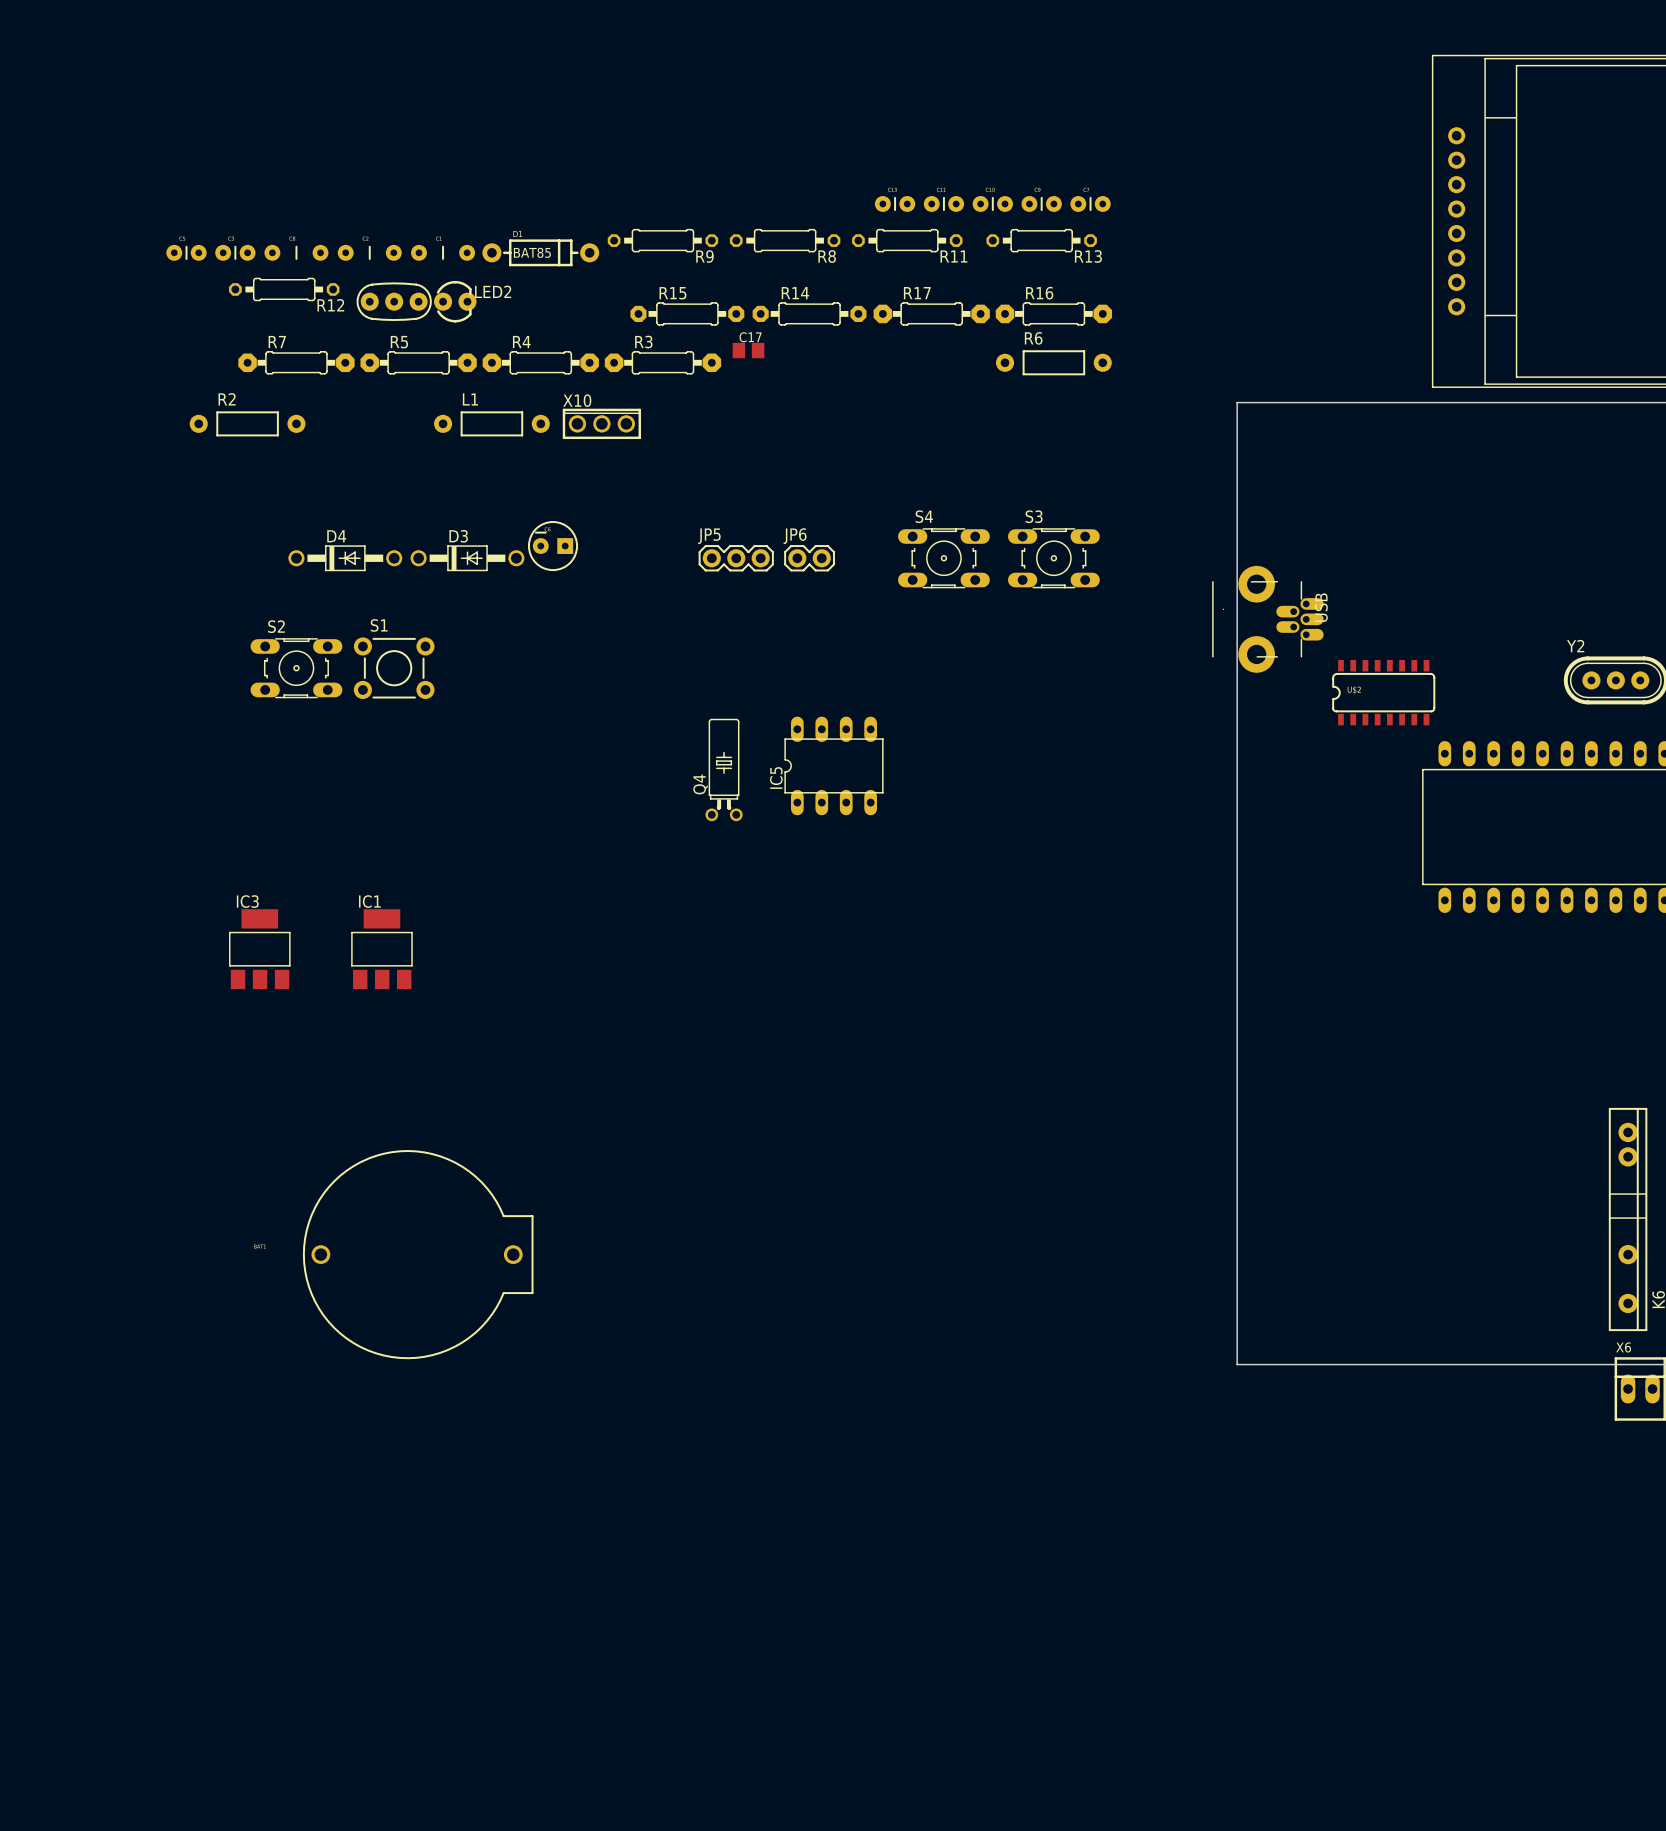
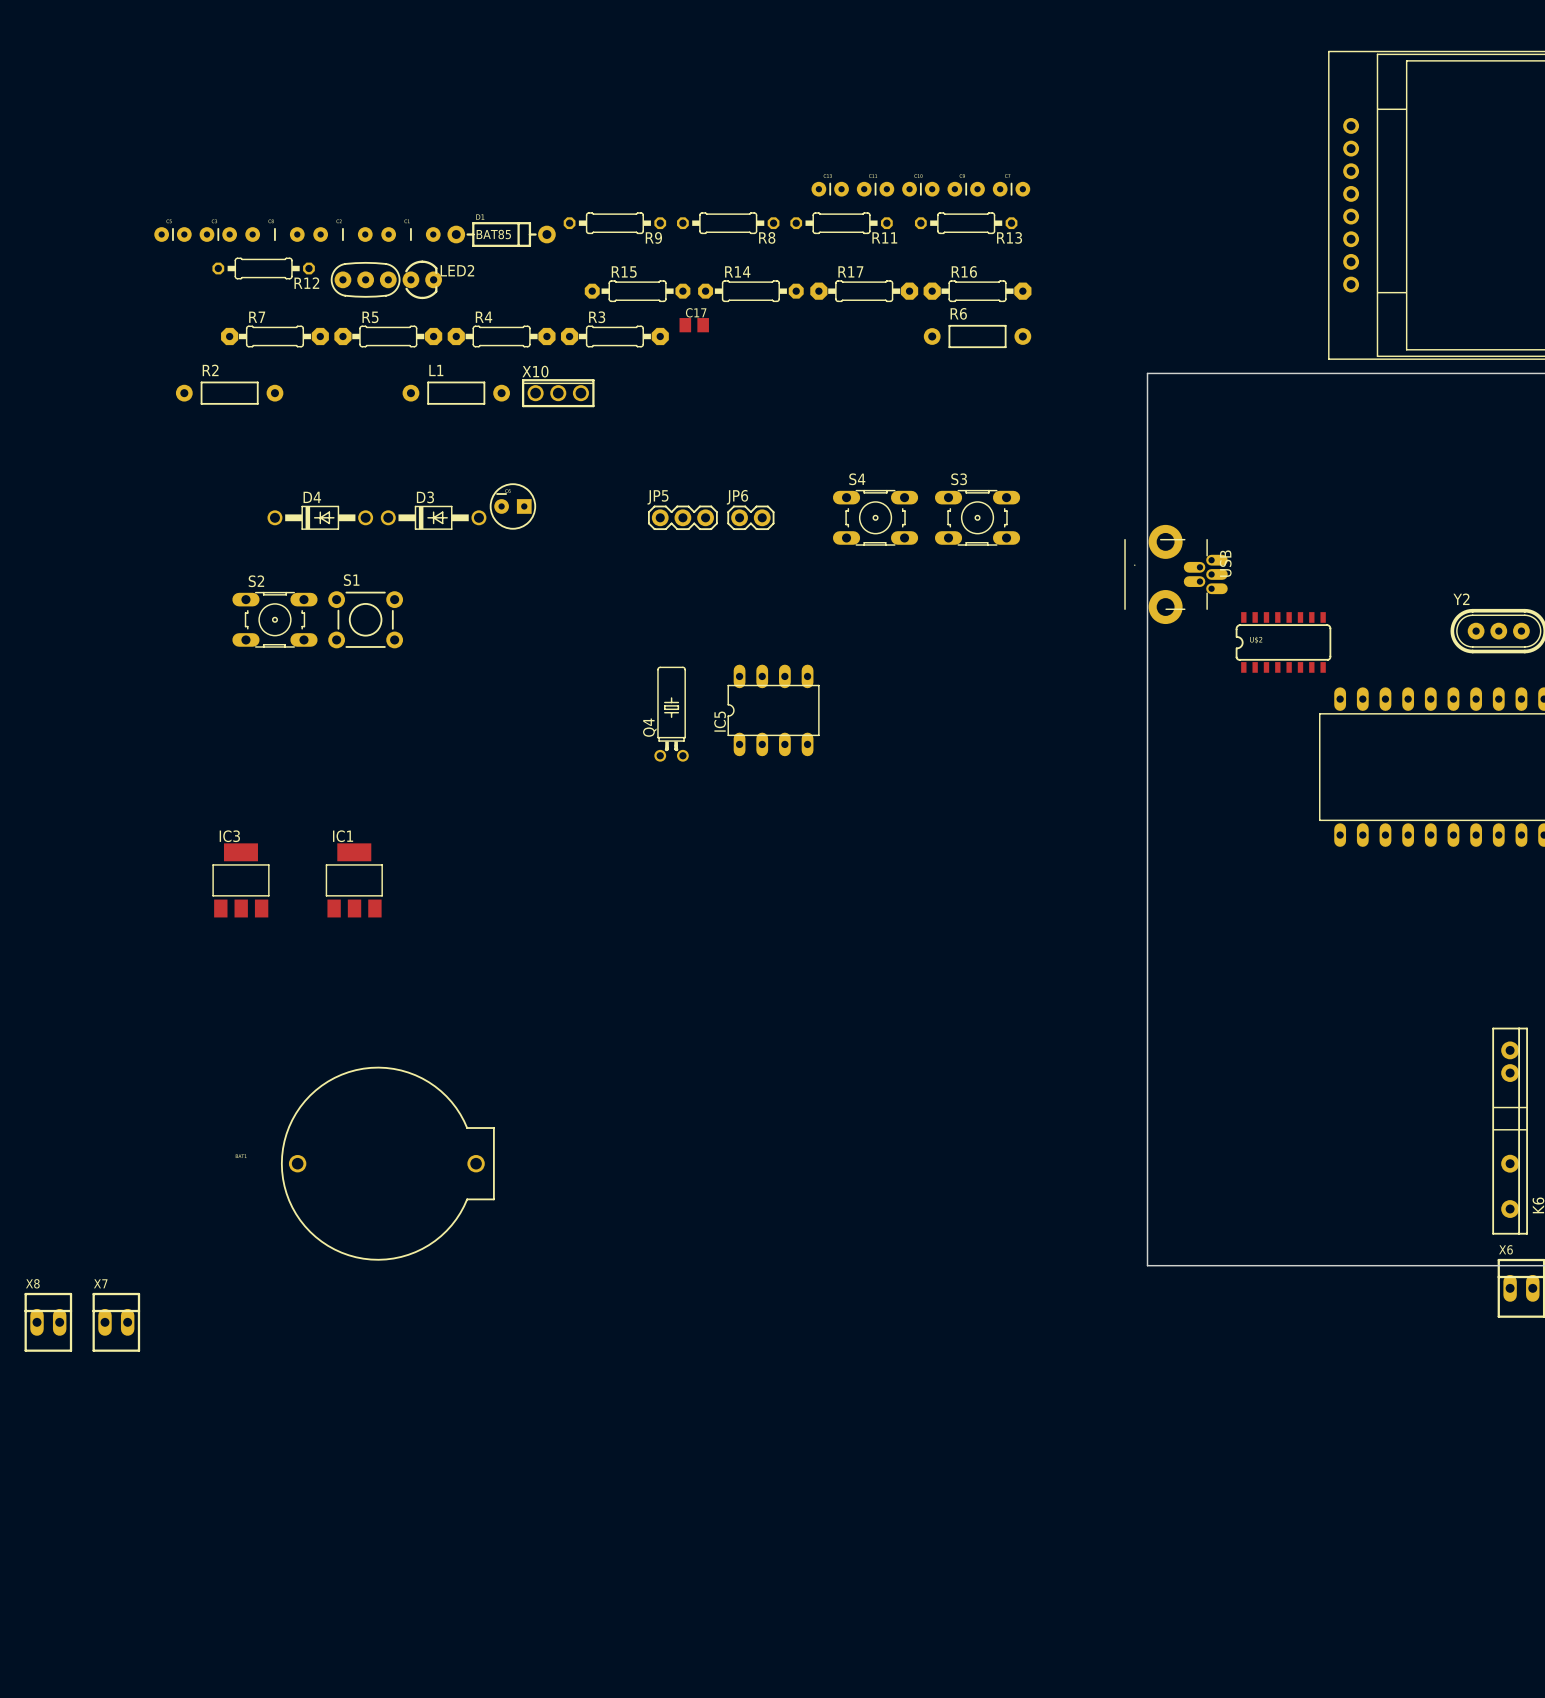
X8: none -> (48, 1322)
X7: none -> (116, 1322)

